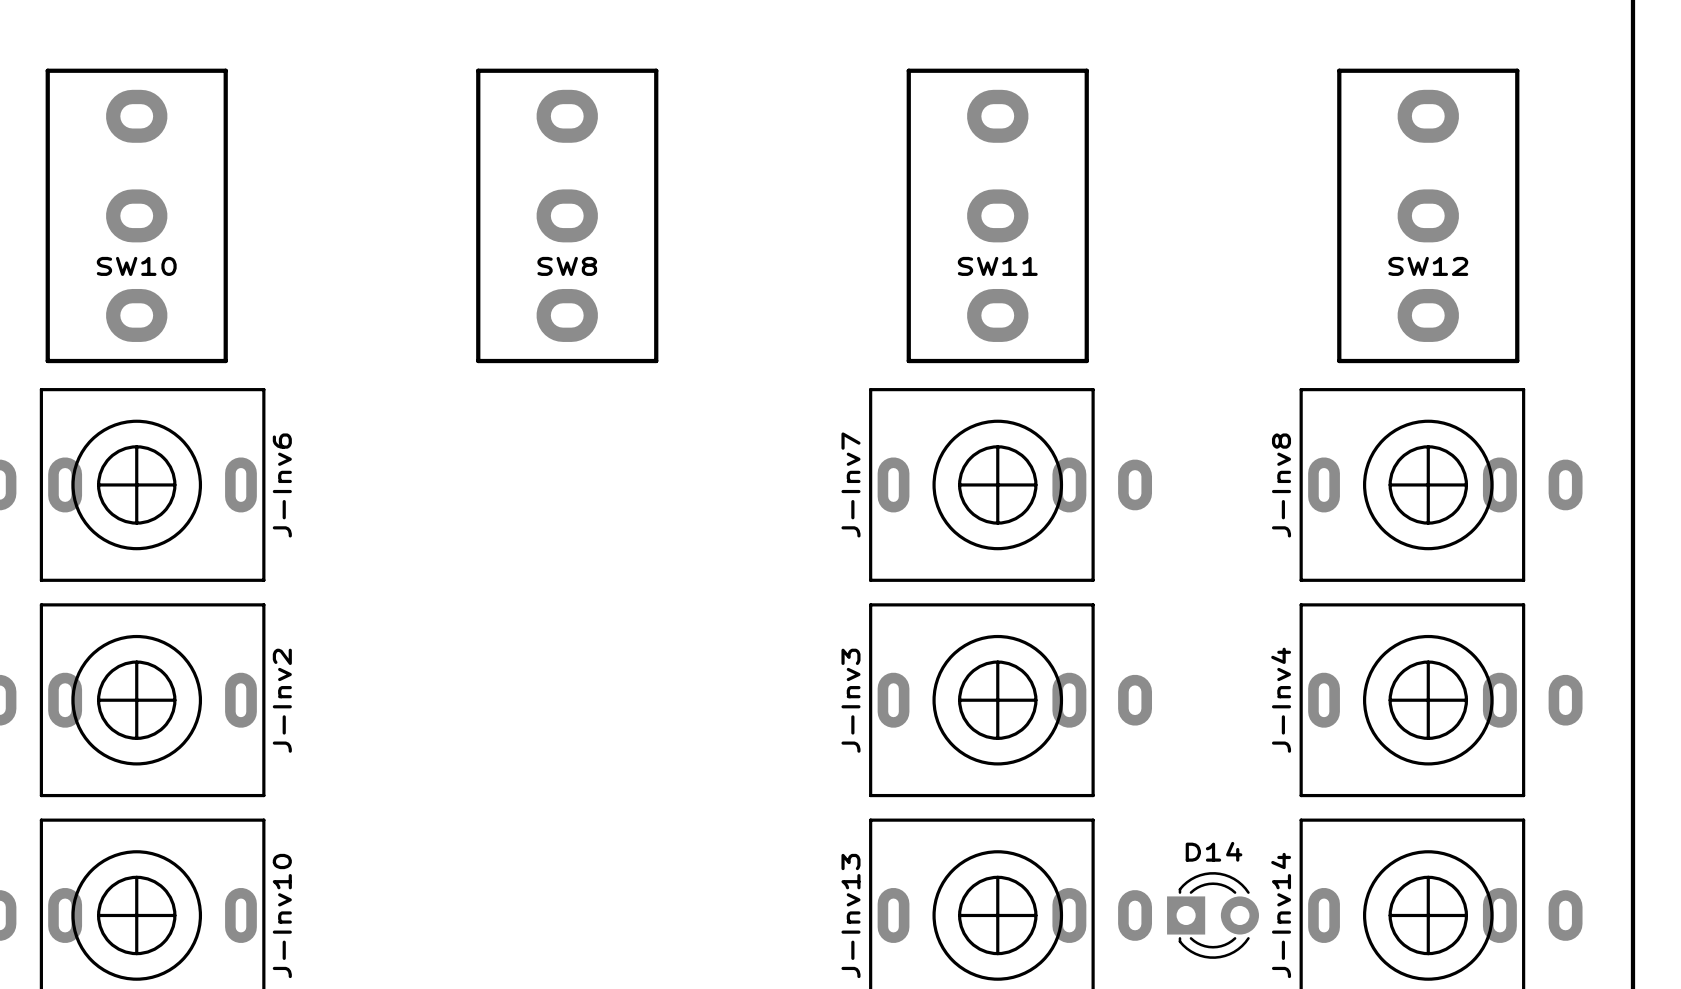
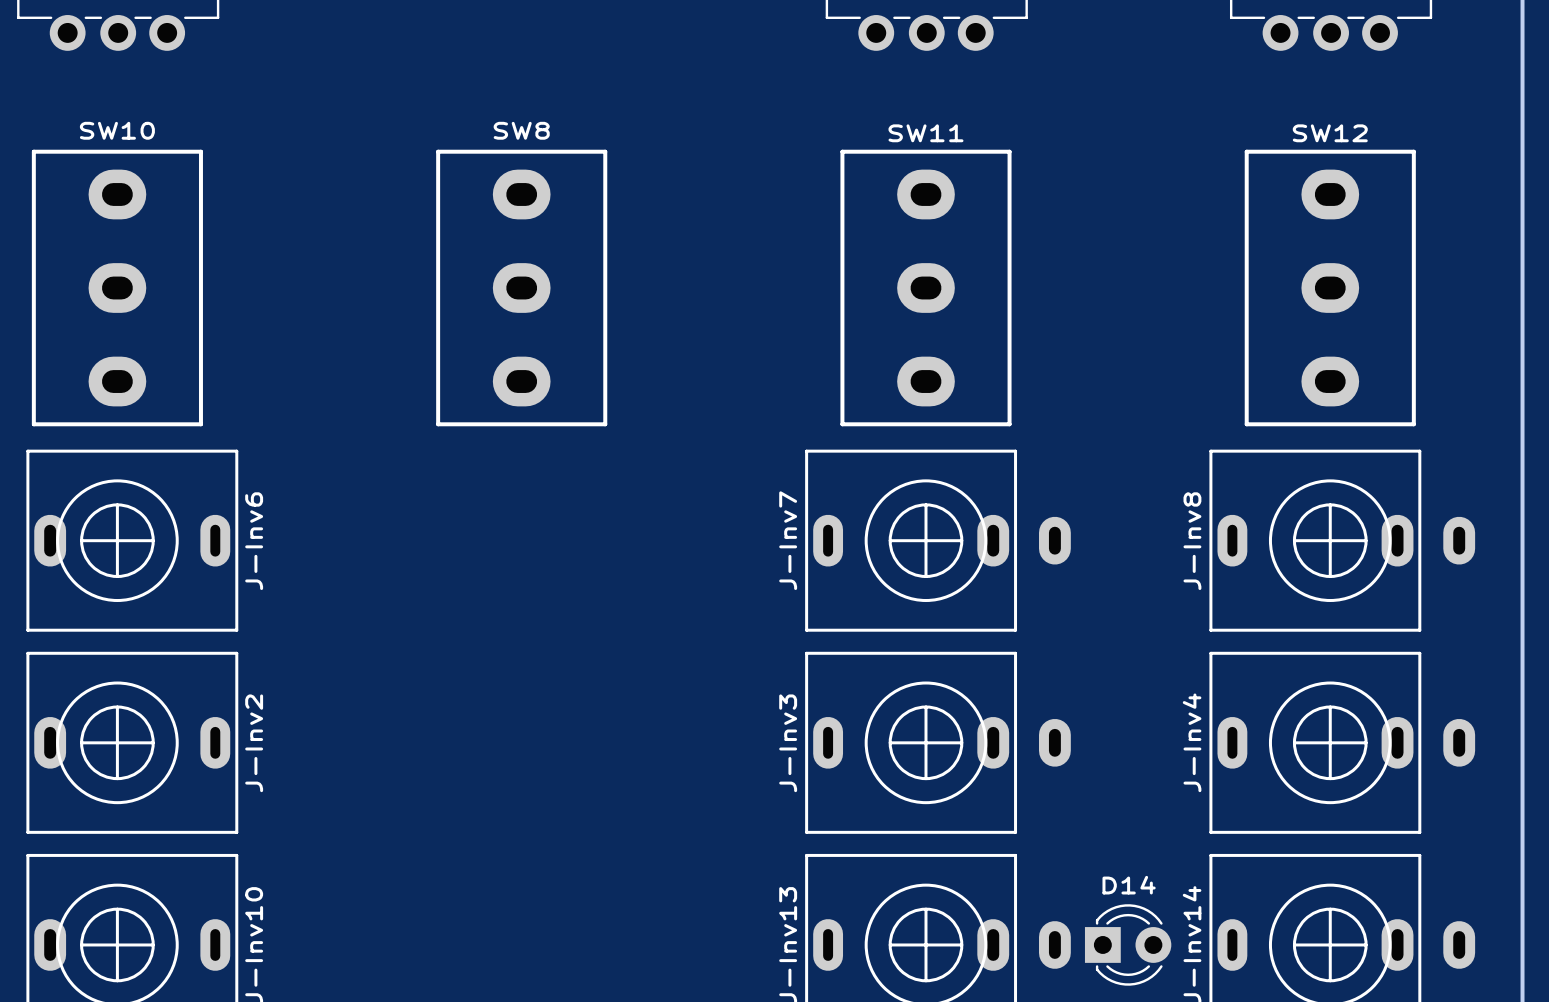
SW10 name position: SW10 (136, 266) -> SW10 (117, 130)
SW8 name position: SW8 (567, 266) -> SW8 (521, 130)
SW11 name position: SW11 (997, 266) -> SW11 (925, 133)
SW12 name position: SW12 (1428, 266) -> SW12 (1330, 133)

